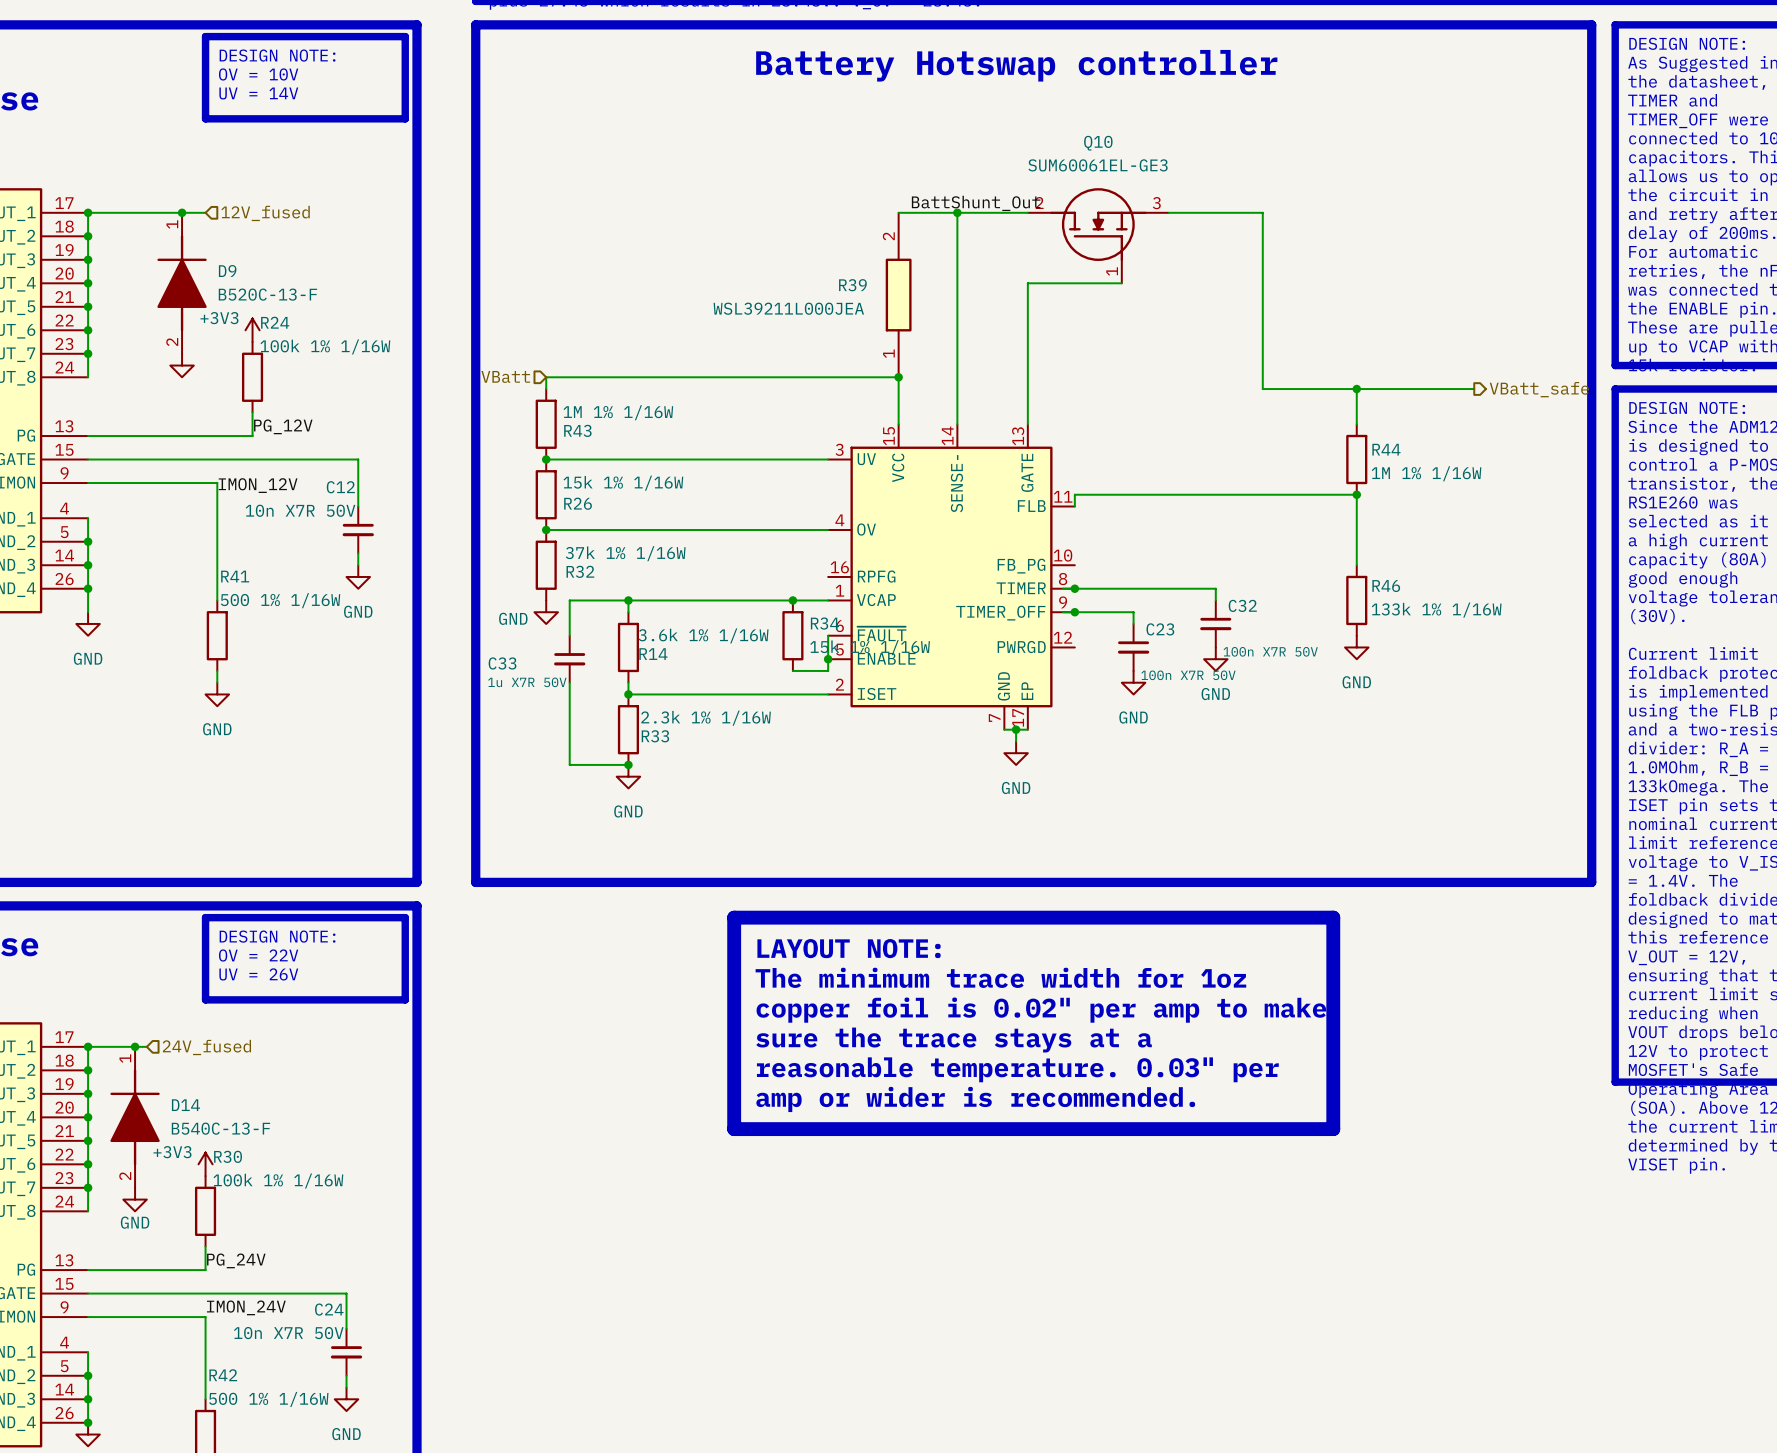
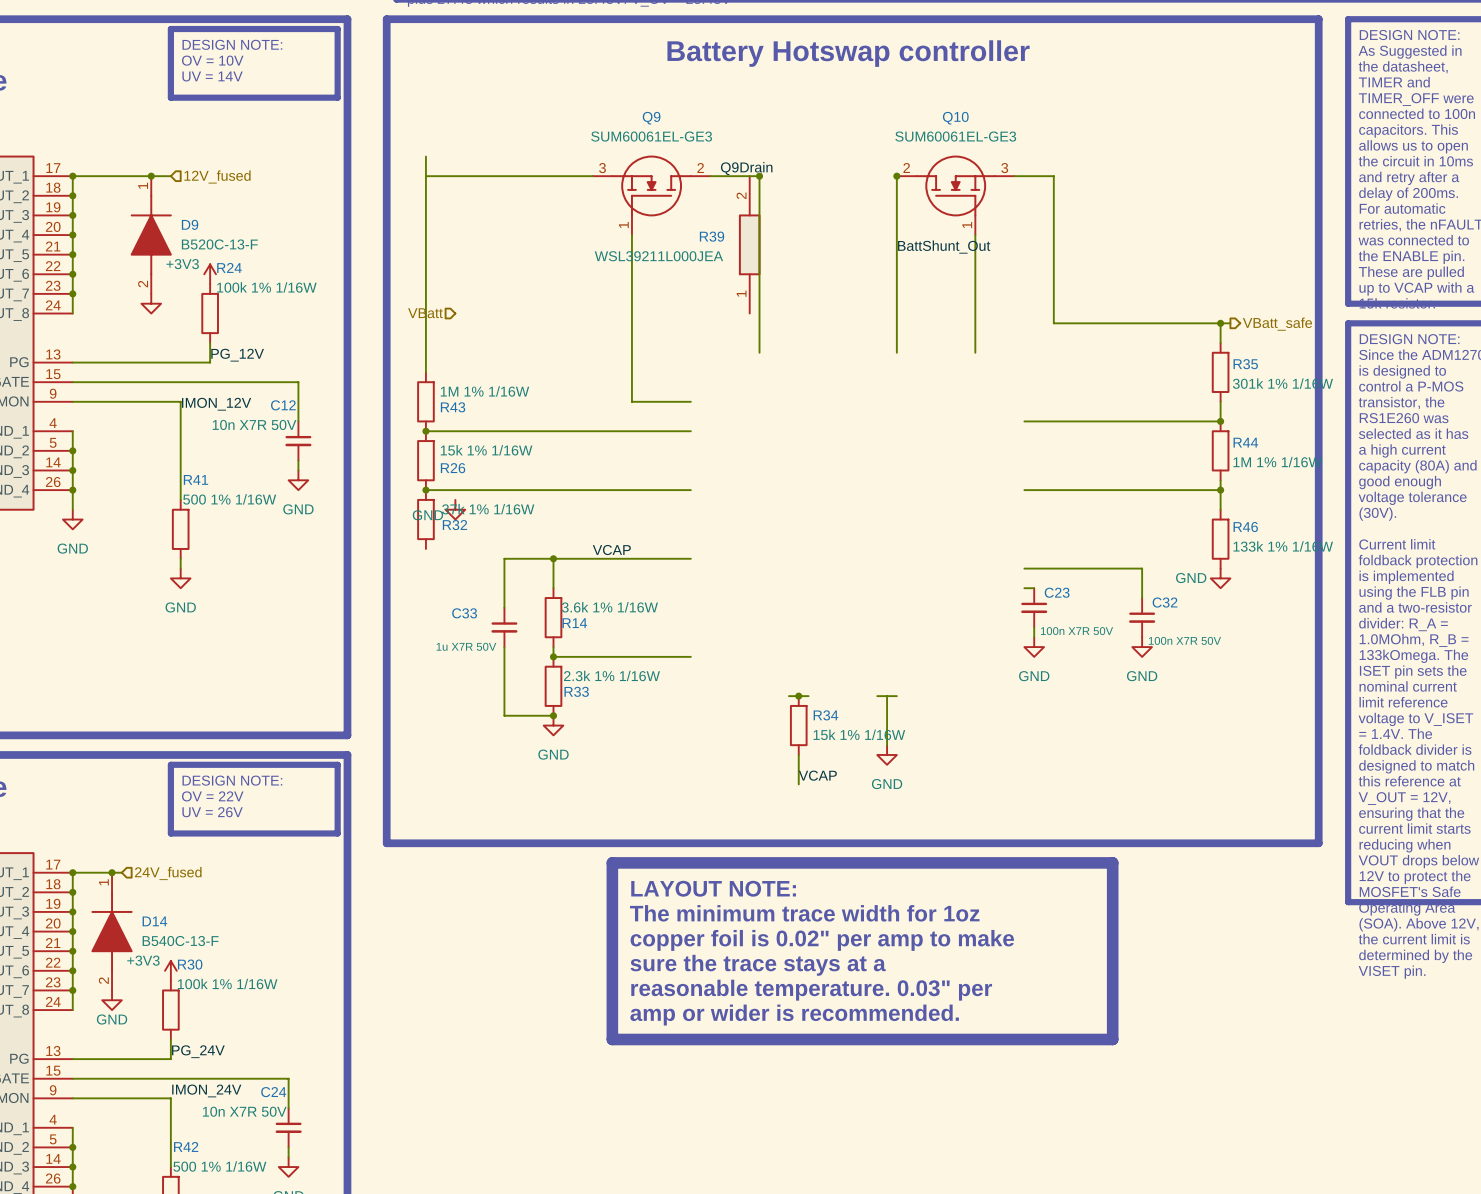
line: (475, 24) (475, 882) (1591, 882) (1591, 24) (1579, 24) -> (396, 19) (386, 19) (386, 843) (1318, 843) (1318, 19)
wire: none -> (425, 156) (425, 372)
label: none -> Q9Drain (746, 168)
label position: BattShunt_Out (976, 203) -> BattShunt_Out (944, 247)
wire: none -> (425, 176) (592, 176)
wire: none -> (710, 176) (749, 176)
wire: (910, 212) (1027, 212) -> (759, 176) (759, 352)
wire: (957, 212) (957, 424) -> (896, 176) (896, 352)
junction position: (957, 212) -> (759, 176)
junction: none -> (896, 176)
Q9: none -> SUM60061EL-GE3 (651, 195)
Q10 position: (1098, 235) -> (955, 195)
wire: none -> (631, 235) (631, 401) (690, 401)
wire: (1121, 283) (1027, 283) (1027, 424) -> none
wire: none -> (975, 235) (975, 352)
junction: (898, 377) -> none
wire: (546, 389) (546, 377) (898, 377) (898, 424) -> none
wire: (1356, 389) (1356, 424) -> (1220, 480) (1220, 509)
junction: (1356, 389) -> none
wire: none -> (1220, 323) (1220, 342)
junction: none -> (1220, 323)
R43 position: (546, 424) -> (425, 401)
R35: none -> 301k 1% 1/16W (1220, 372)
wire: (546, 459) (828, 459) -> none
junction: (546, 459) -> none
R44 position: (1356, 459) -> (1220, 450)
wire: none -> (1220, 401) (1220, 421) (1024, 421)
R26 position: (546, 494) -> (425, 460)
junction: (1356, 494) -> none
wire: (1074, 506) (1074, 494) (1356, 494) (1356, 565) -> none
junction: none -> (1220, 421)
wire: none -> (425, 431) (690, 431)
junction: none -> (425, 431)
wire: (546, 529) (828, 529) -> none
junction: (546, 529) -> none
R32 position: (546, 565) -> (425, 519)
part: (951, 576) -> none
wire: none -> (425, 490) (690, 490)
junction: none -> (425, 490)
wire: (1063, 588) (1215, 588) (1215, 600) -> none
junction: (1074, 588) -> none
wire: none -> (1024, 490) (1220, 490)
junction: none -> (1220, 490)
wire: (628, 600) (628, 612) -> none
junction: (628, 600) -> none
junction: (792, 600) -> none
wire: (828, 600) (569, 600) (569, 635) -> none
R46 position: (1356, 600) -> (1220, 539)
wire: (1063, 612) (1133, 612) (1133, 623) -> none
junction: (1074, 612) -> none
C32 position: (1215, 623) -> (1142, 617)
R34 position: (792, 635) -> (798, 725)
wire: (828, 635) (828, 670) -> (553, 558) (553, 588)
R14 position: (628, 647) -> (553, 617)
C23 position: (1133, 647) -> (1034, 607)
power symbol: GND (1356, 647) -> none
C33 position: (569, 659) -> (504, 627)
junction: (828, 659) -> none
power symbol: GND (1215, 659) -> none
label: none -> VCAP (611, 550)
C33 name position: C33 (502, 663) -> C33 (464, 613)
junction: none -> (553, 558)
wire: none -> (661, 558) (504, 558) (504, 607)
wire: (569, 682) (569, 764) (628, 764) -> (504, 647) (504, 715) (553, 715)
wire: (628, 682) (628, 694) (828, 694) -> none
power symbol: GND (1133, 682) -> none
wire: none -> (1024, 568) (1142, 568) (1142, 598)
junction: (628, 694) -> none
power symbol: none -> GND (1220, 578)
wire: none -> (1024, 588) (1034, 588)
R33 position: (628, 729) -> (553, 686)
wire: (1004, 729) (1027, 729) -> (877, 696) (896, 696)
wire: (1016, 729) (1016, 741) -> (1034, 627) (1034, 637)
junction: (1016, 729) -> none
power symbol: GND (1016, 753) -> none
junction position: (628, 764) -> (553, 656)
power symbol position: GND (628, 776) -> GND (553, 725)
wire: none -> (553, 647) (553, 656) (690, 656)
power symbol: none -> GND (1034, 647)
power symbol: none -> GND (1142, 647)
wire: none -> (788, 696) (808, 696)
junction: none -> (798, 696)
wire: none -> (887, 696) (887, 745)
junction: none -> (553, 715)
wire: none -> (798, 754) (798, 784)
power symbol: none -> GND (887, 754)
label: none -> VCAP (817, 775)
text position: LAYOUT NOTE: (849, 948) -> LAYOUT NOTE: (713, 888)
text position: The minimum trace width for 1oz (1000, 977) -> The minimum trace width for 1oz (804, 913)
text position: copper foil is 0.02" per amp to make (1041, 1010) -> copper foil is 0.02" per amp to make (822, 940)
line: (734, 1035) (734, 917) (1333, 917) (1333, 1035) -> (612, 862) (1112, 862)
text position: sure the trace stays at a (954, 1040) -> sure the trace stays at a (758, 965)
text position: reasonable temperature. 0.03" per (1017, 1069) -> reasonable temperature. 0.03" per (811, 990)
text position: amp or wider is recommended. (975, 1099) -> amp or wider is recommended. (794, 1015)
line: (734, 1129) (1333, 1129) -> (612, 941) (612, 1039) (1112, 1039) (1112, 941)

